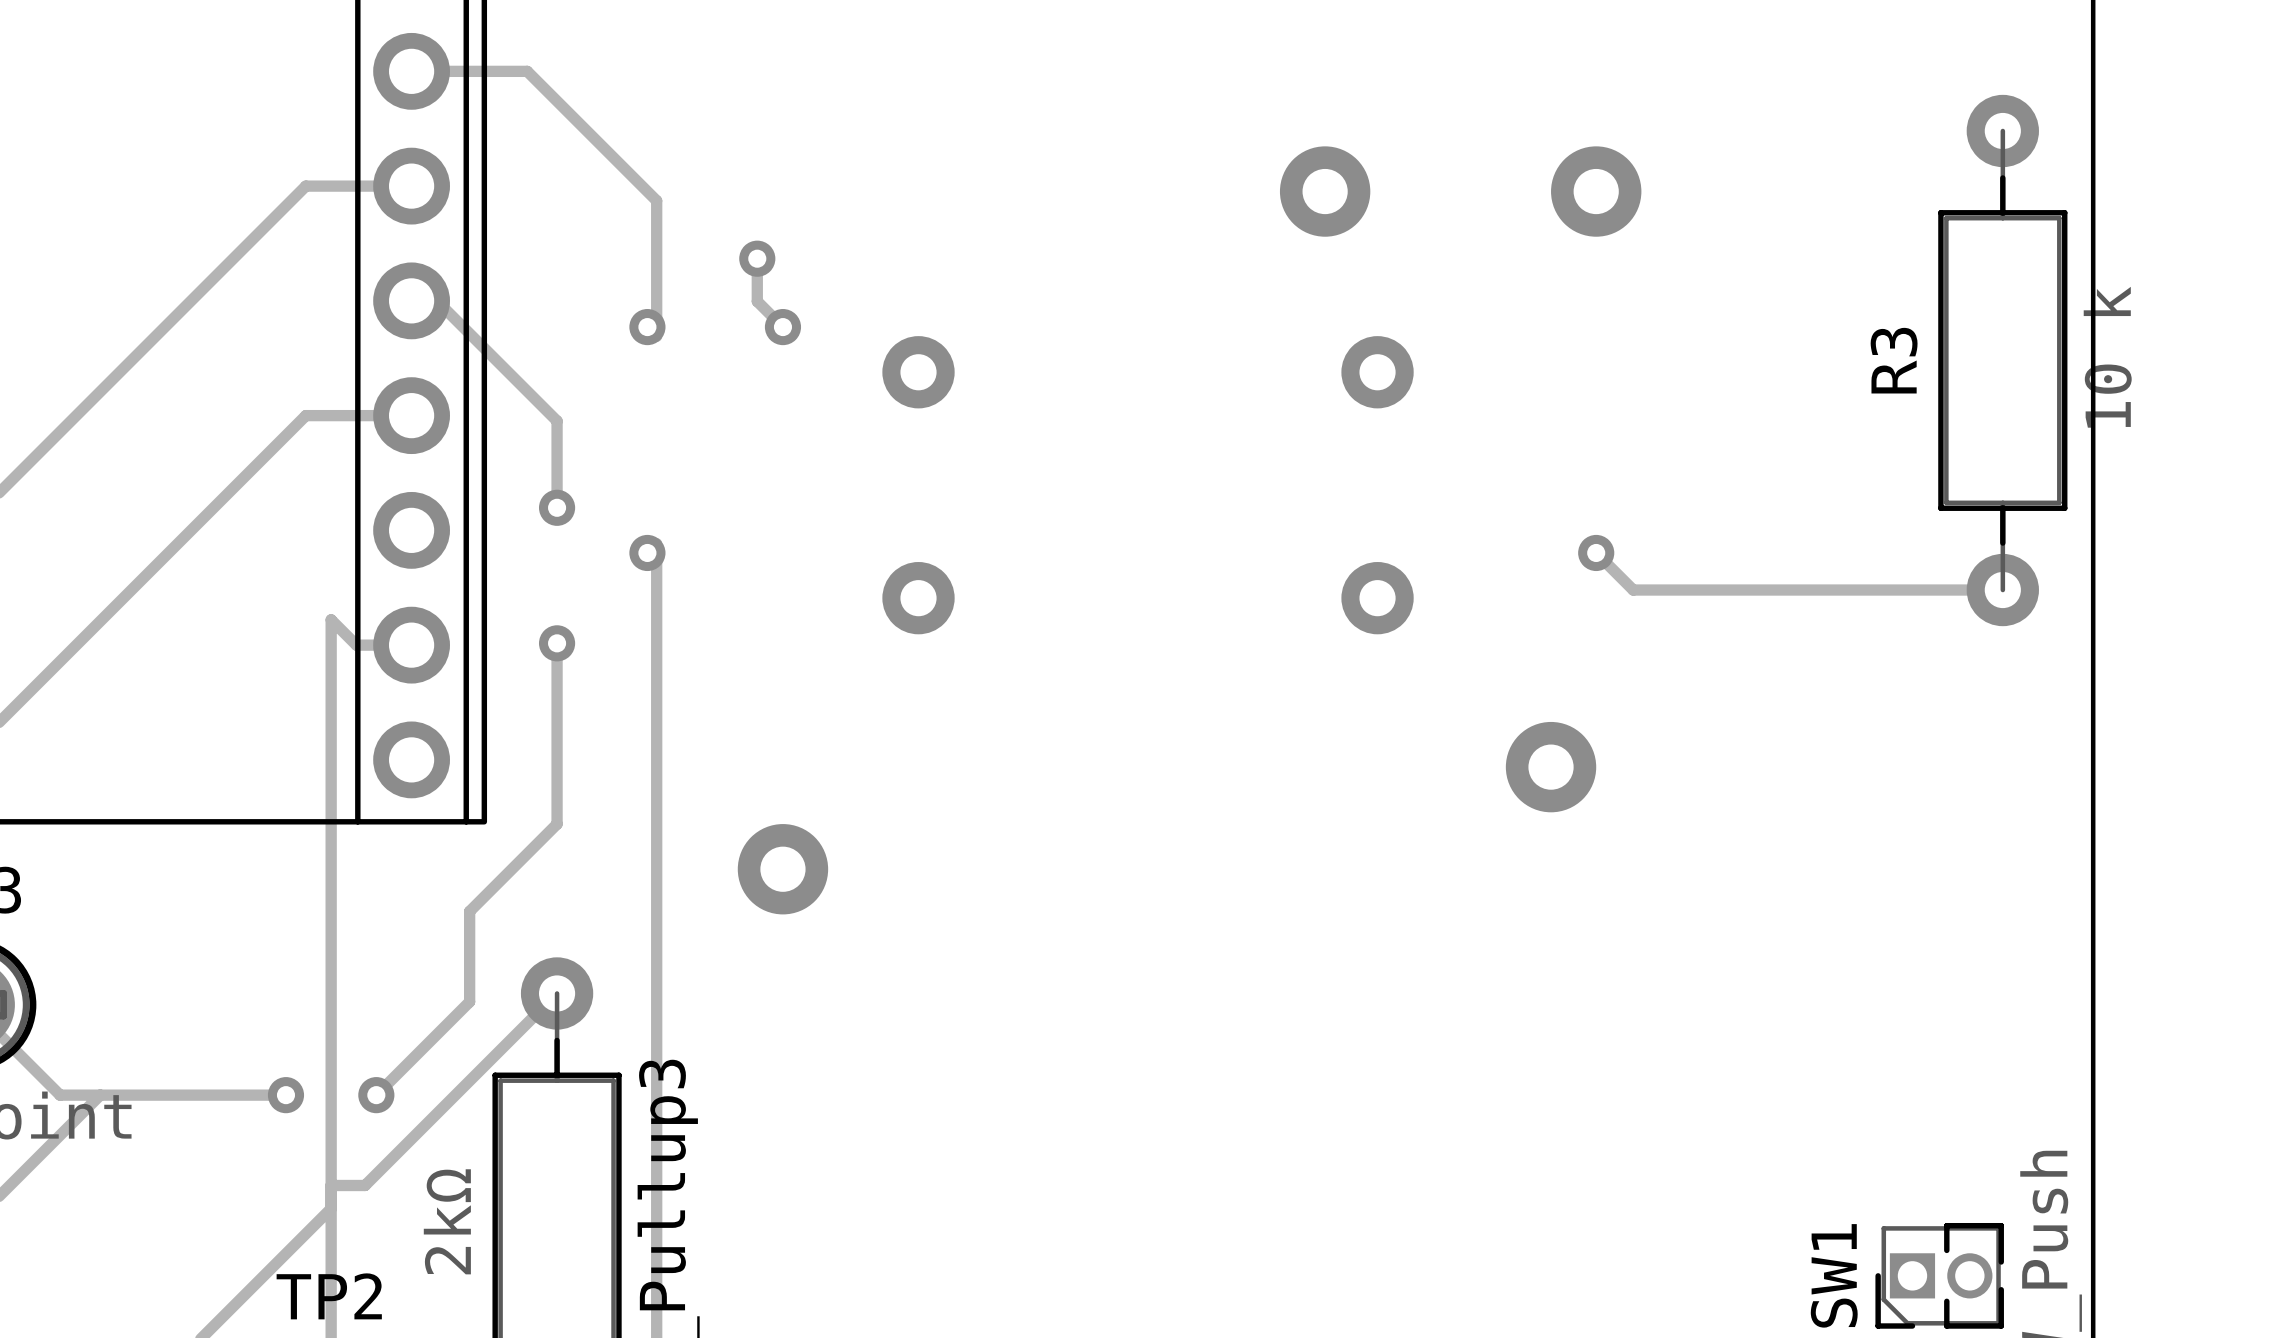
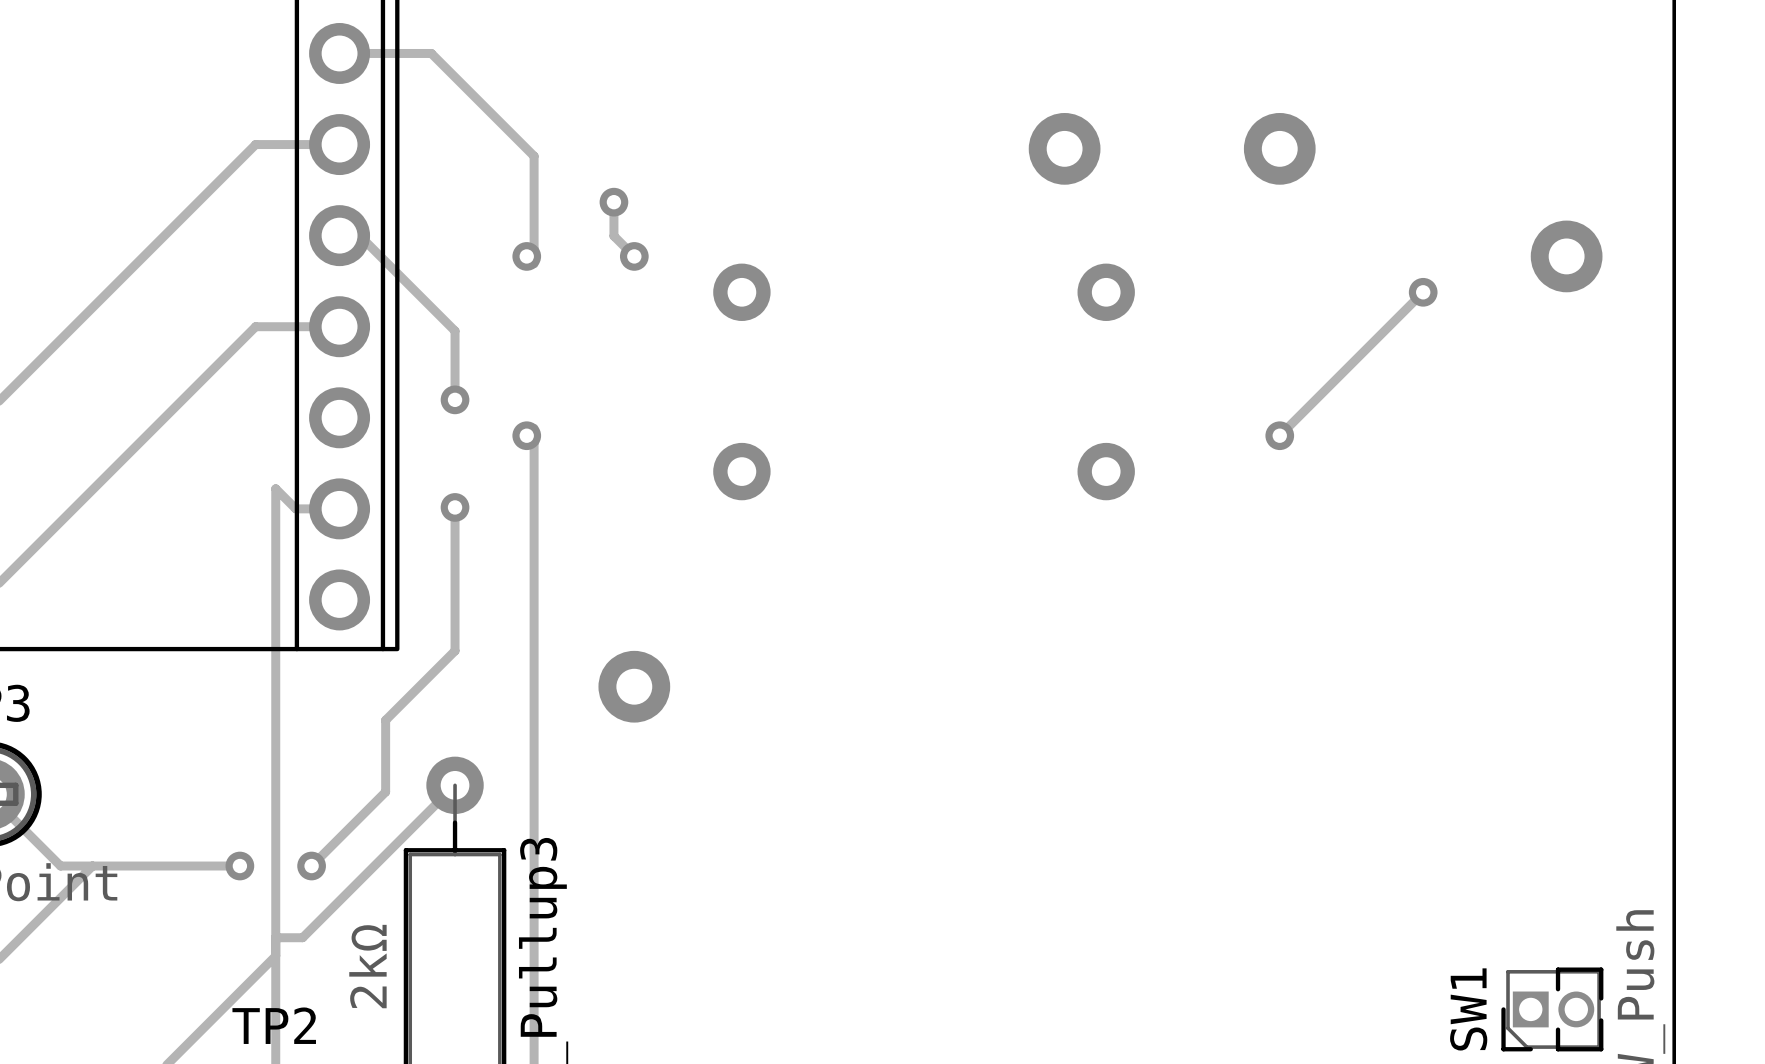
R3: 10 k (2002, 360) -> none
via: none -> (1423, 292)
track: (1596, 552) (1633, 590) (2002, 590) -> (1279, 435) (1423, 292)
part position: (1551, 767) -> (1566, 256)

